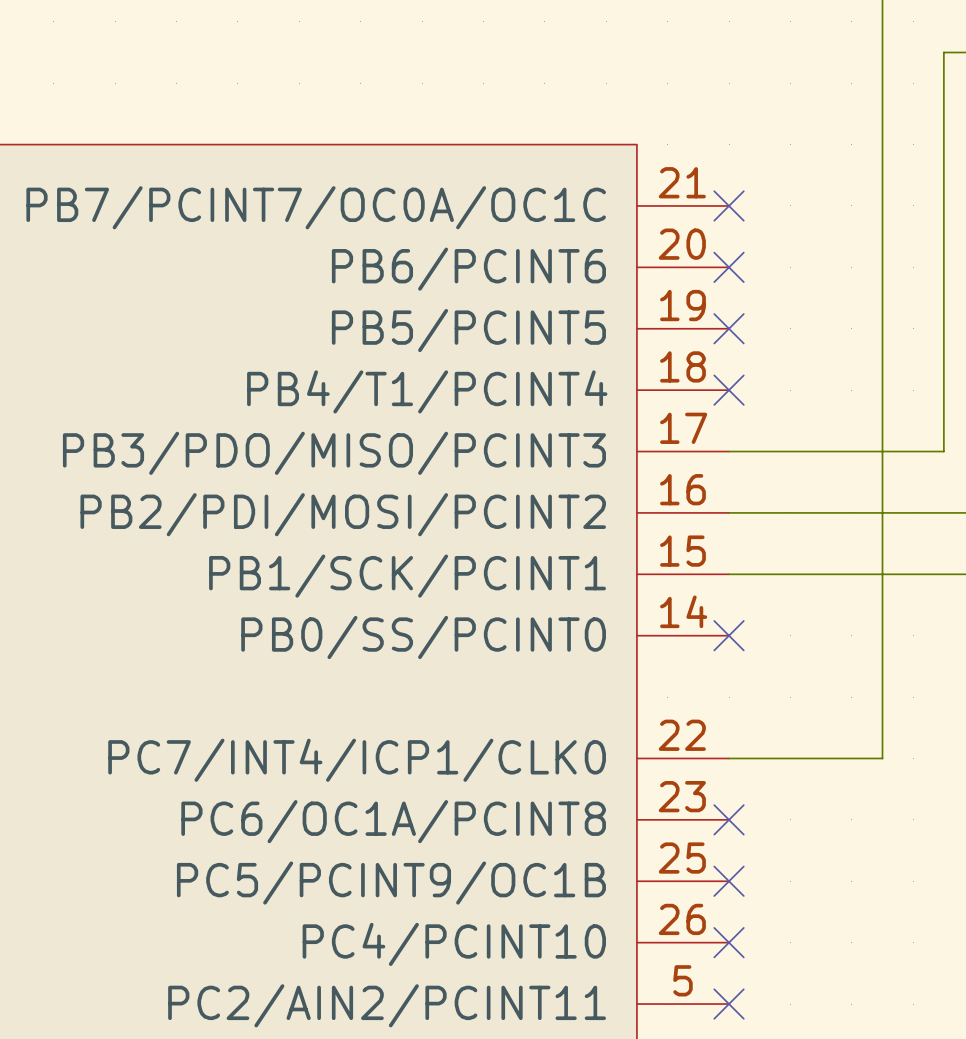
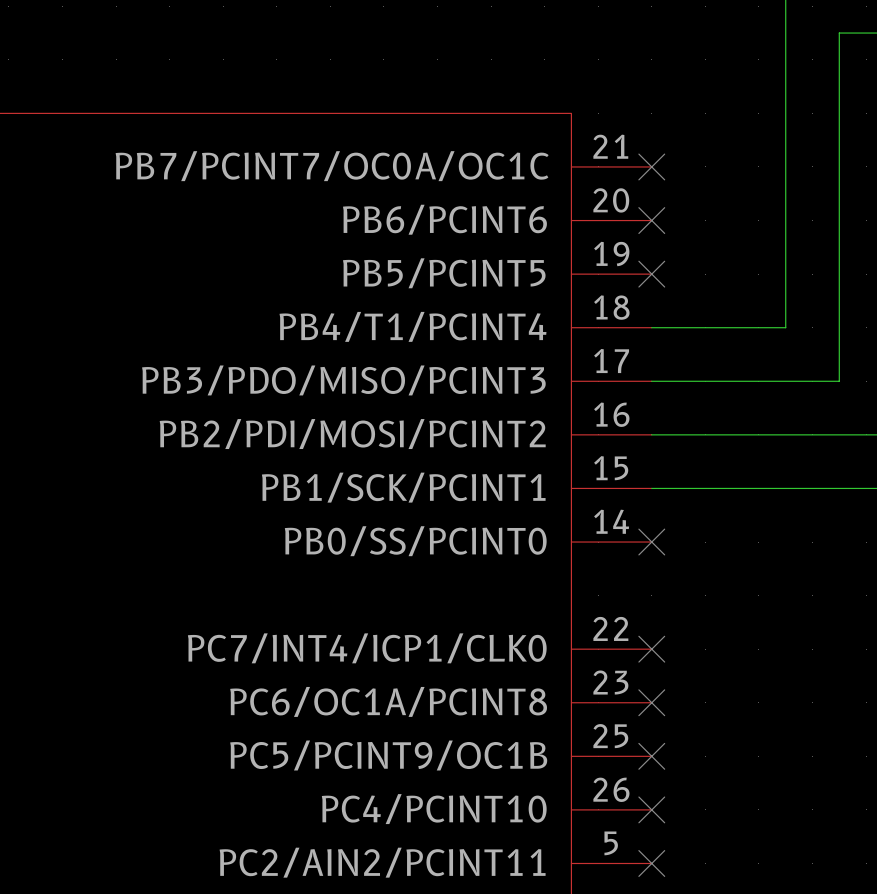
no-connect mark: (729, 390) -> none
wire: (882, 390) (882, 758) (729, 758) -> (785, 327) (651, 327)
no-connect mark: none -> (651, 649)

